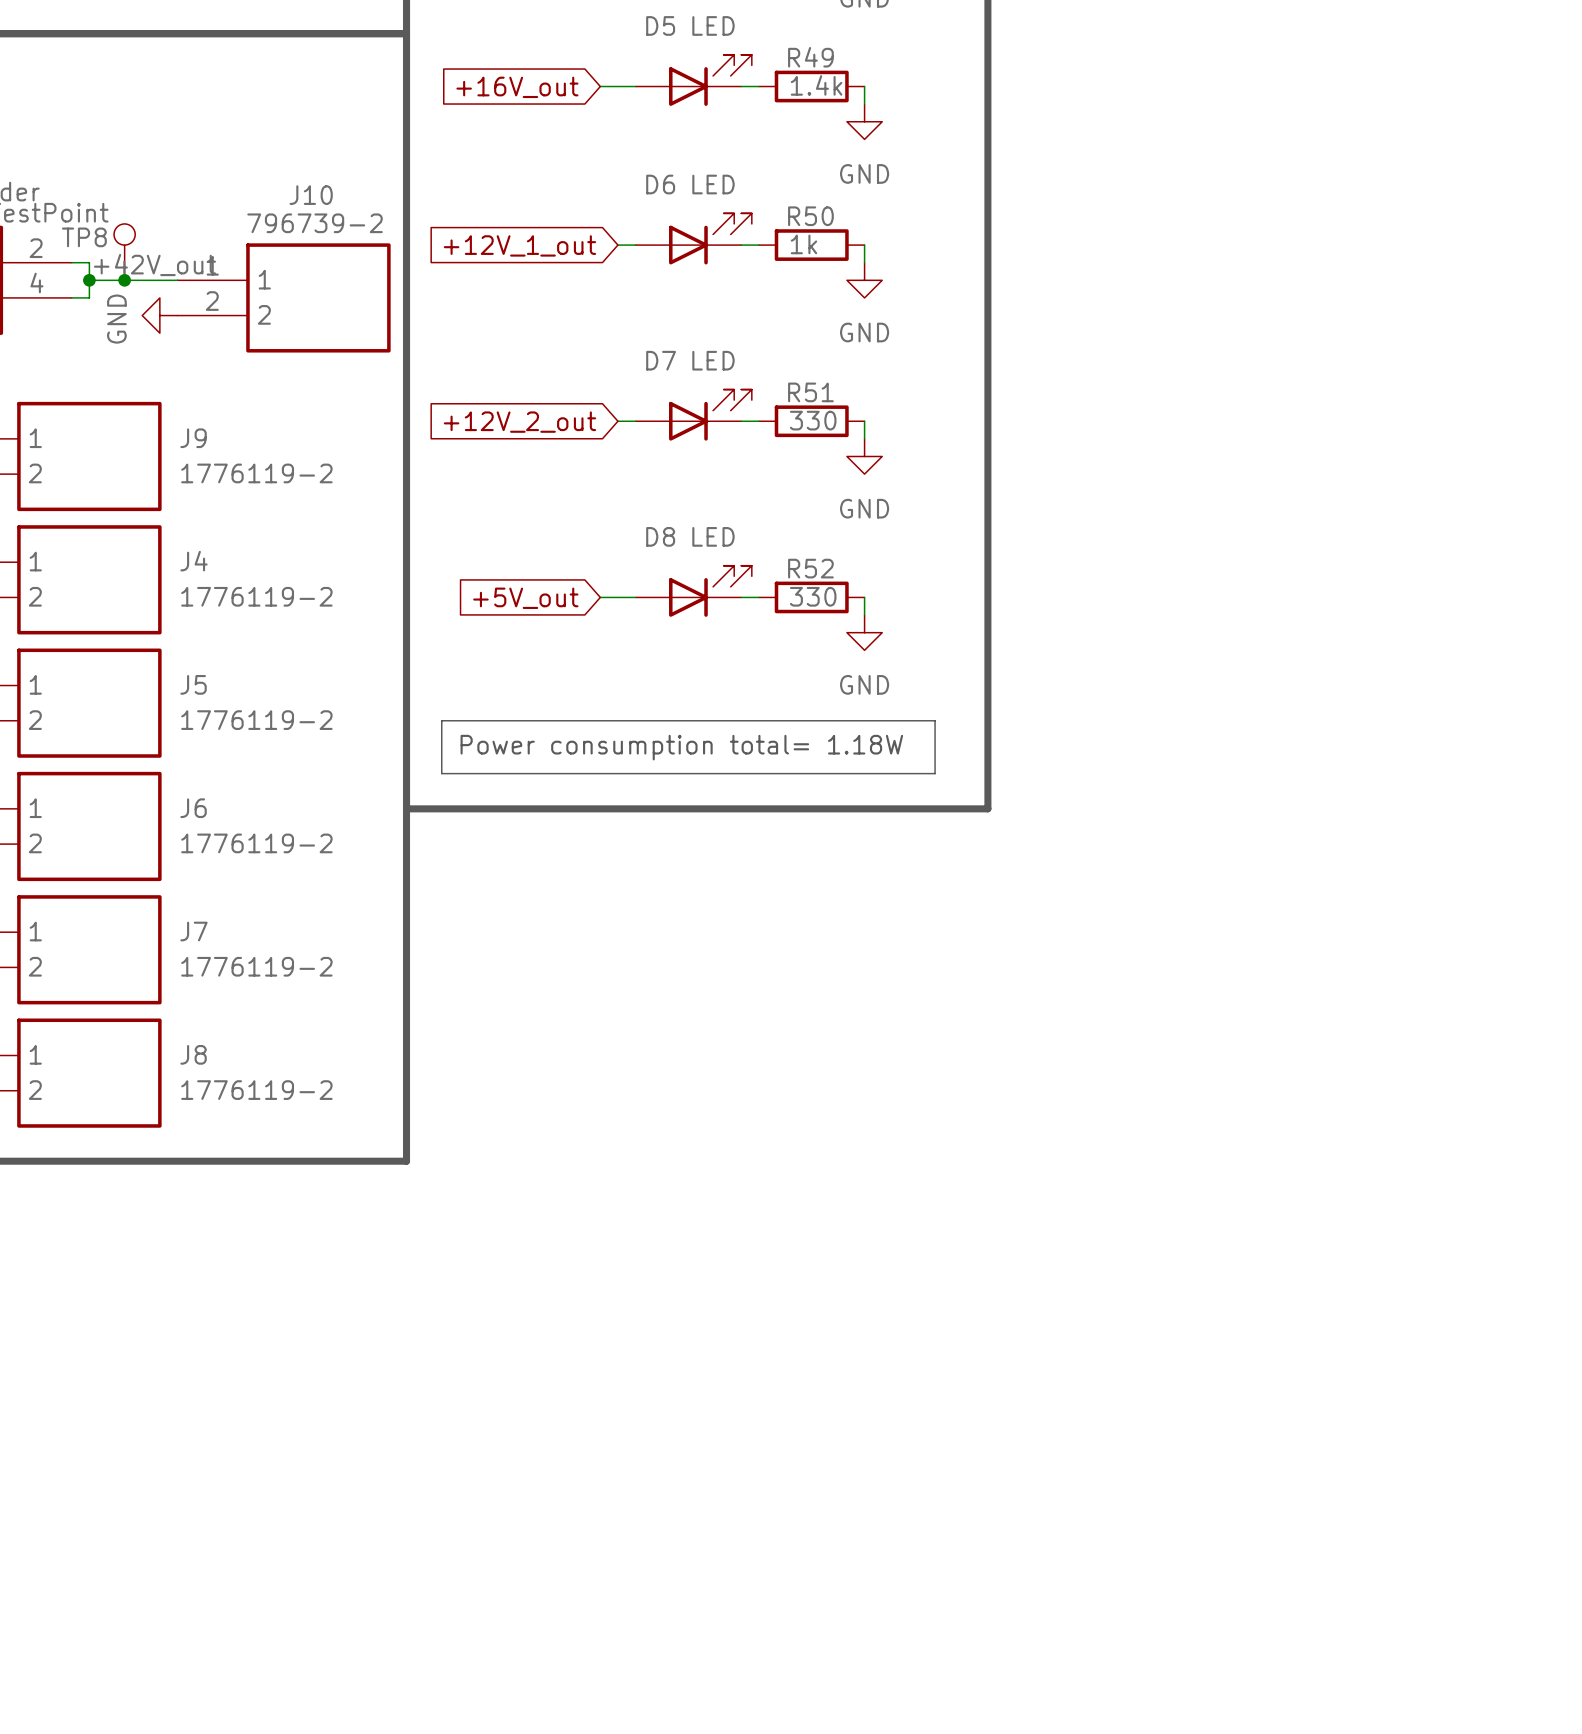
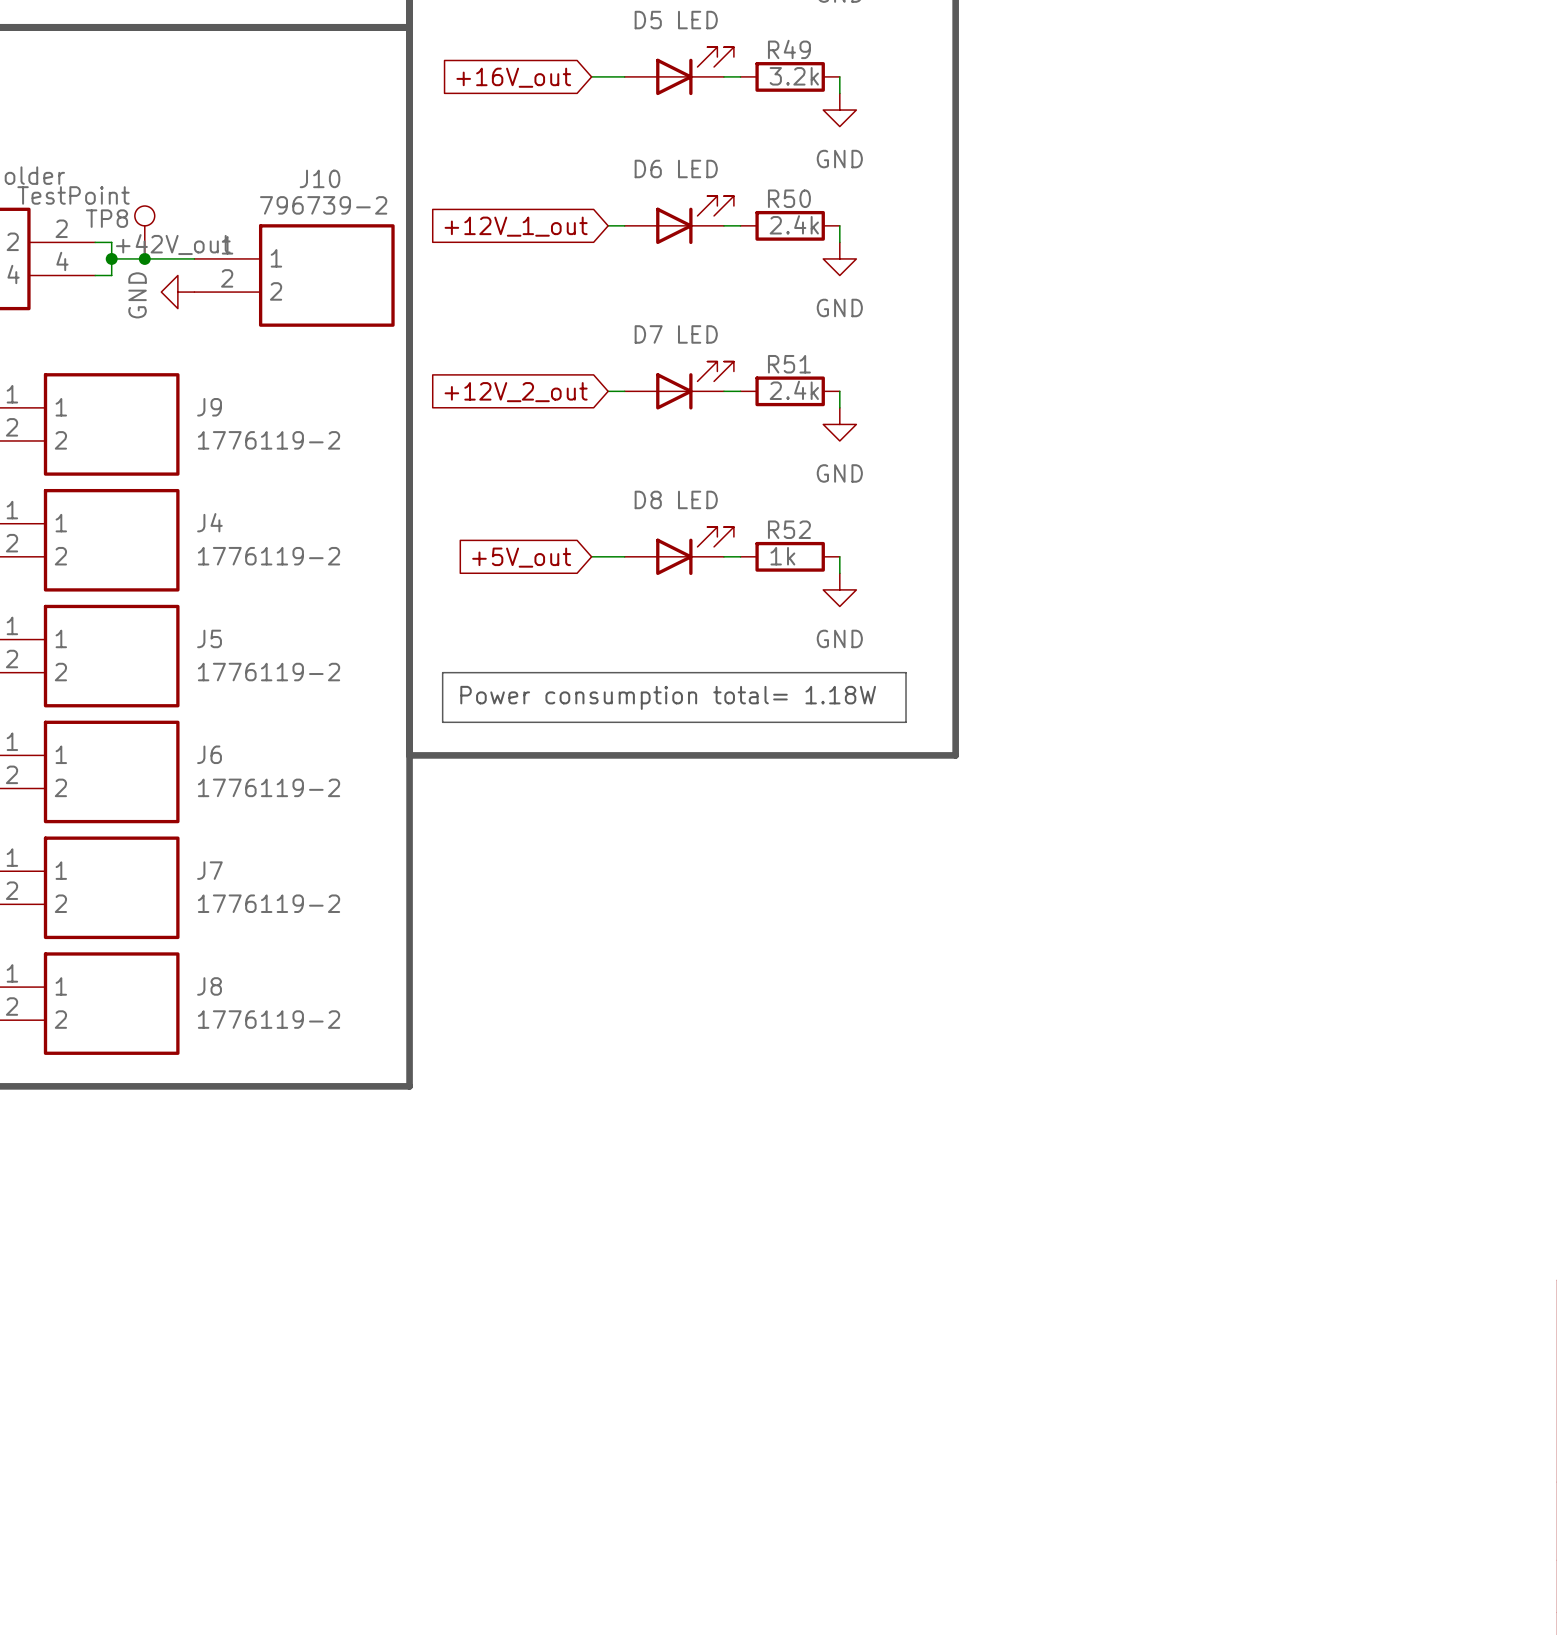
R49 value: 1.4k (816, 85) -> 3.2k (794, 76)
R50 value: 1k (803, 244) -> 2.4k (794, 224)
R51 value: 330 (813, 420) -> 2.4k (794, 390)
R52 value: 330 (813, 596) -> 1k (782, 556)

